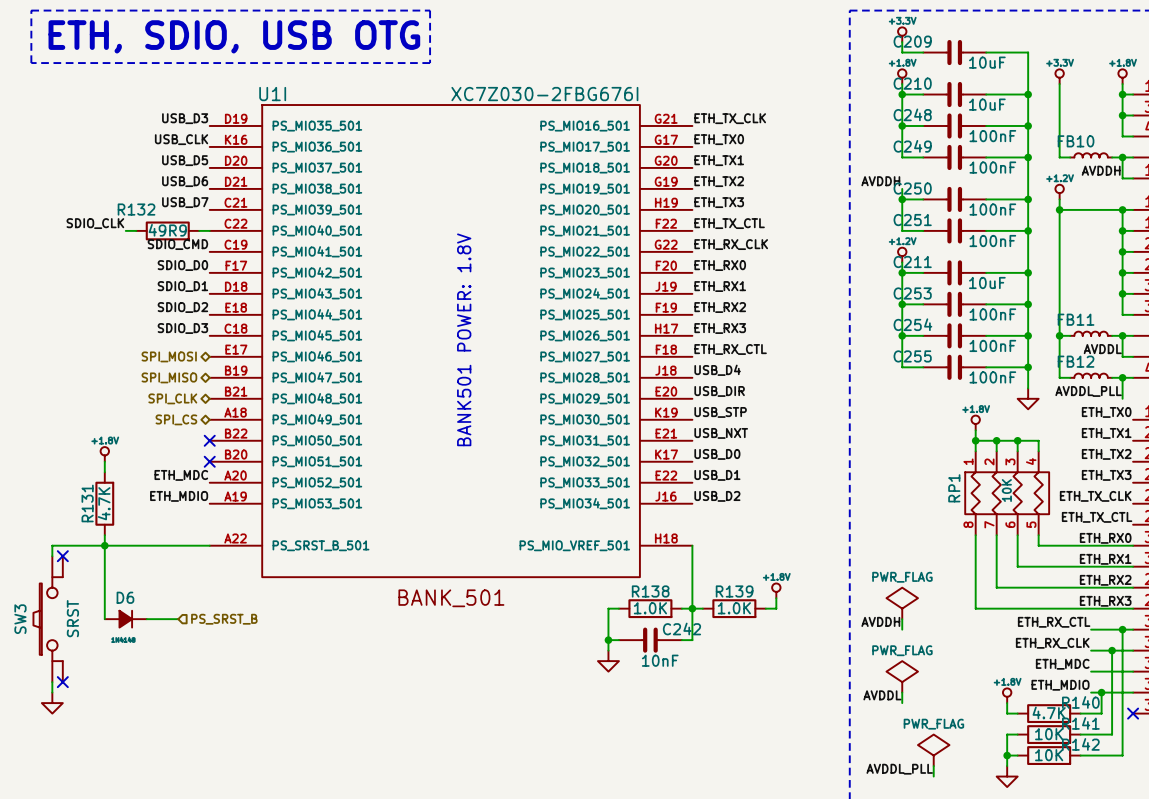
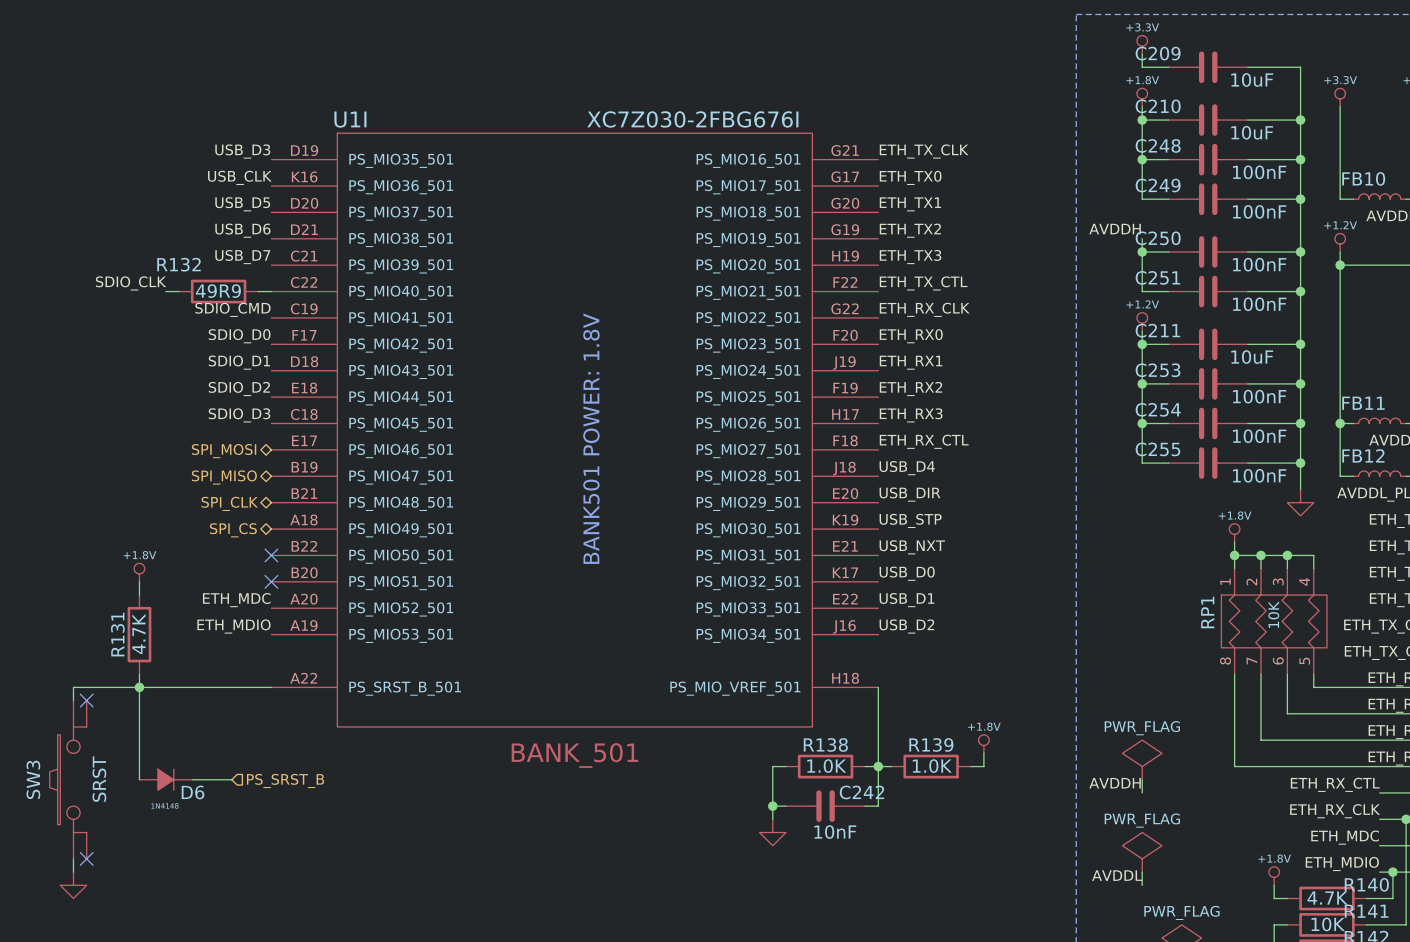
line: (31, 10) (430, 10) (430, 63) (31, 63) (31, 10) -> none
text: ETH, SDIO, USB OTG (234, 36) -> none
D6 name position: D6 (125, 597) -> D6 (193, 792)

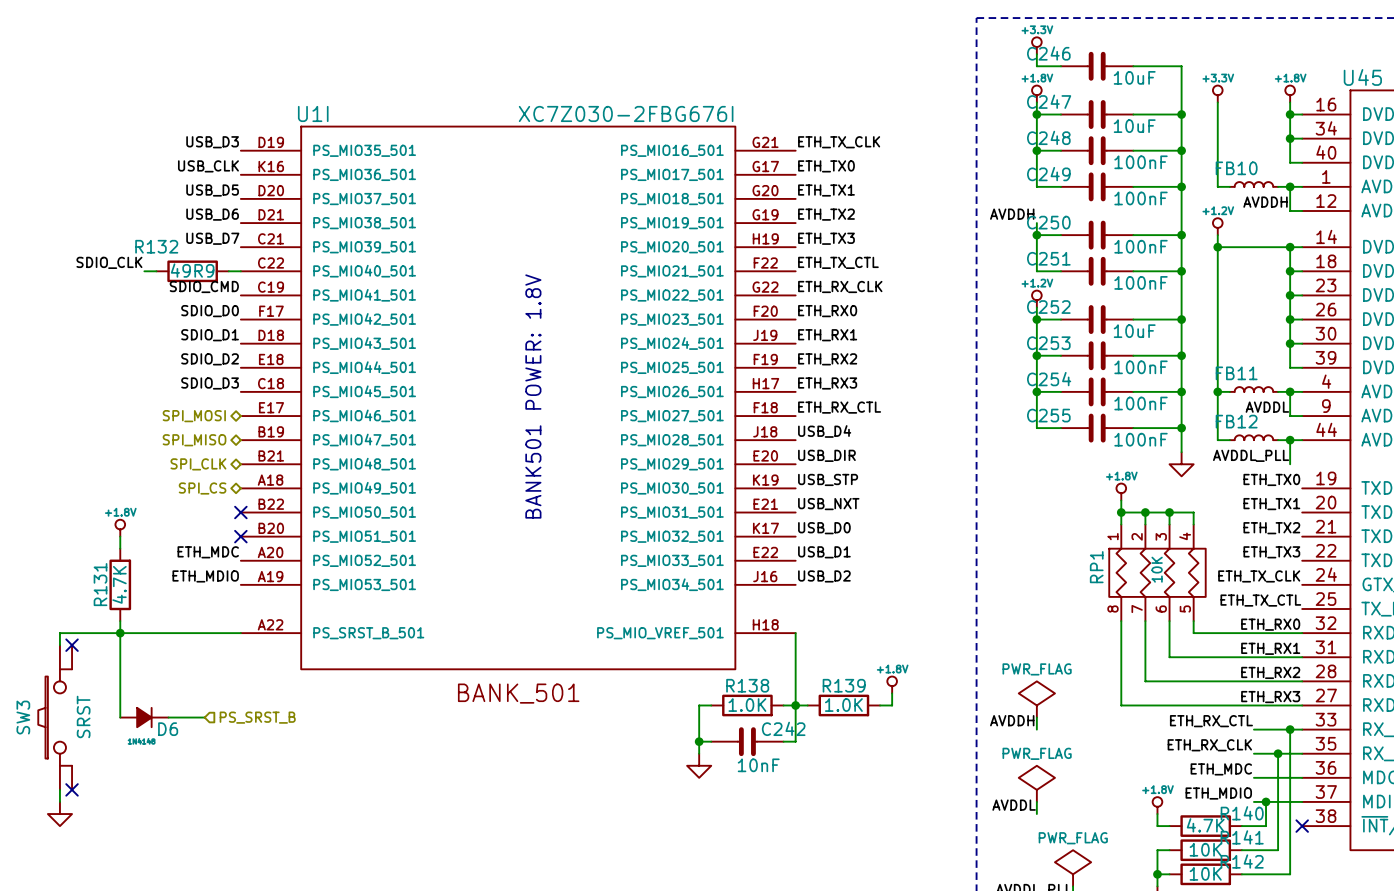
C209 name: C209 (1158, 53) -> C246 (1048, 53)
C210 name: C210 (1158, 106) -> C247 (1049, 101)
C211 name: C211 (1157, 330) -> C252 (1048, 307)

